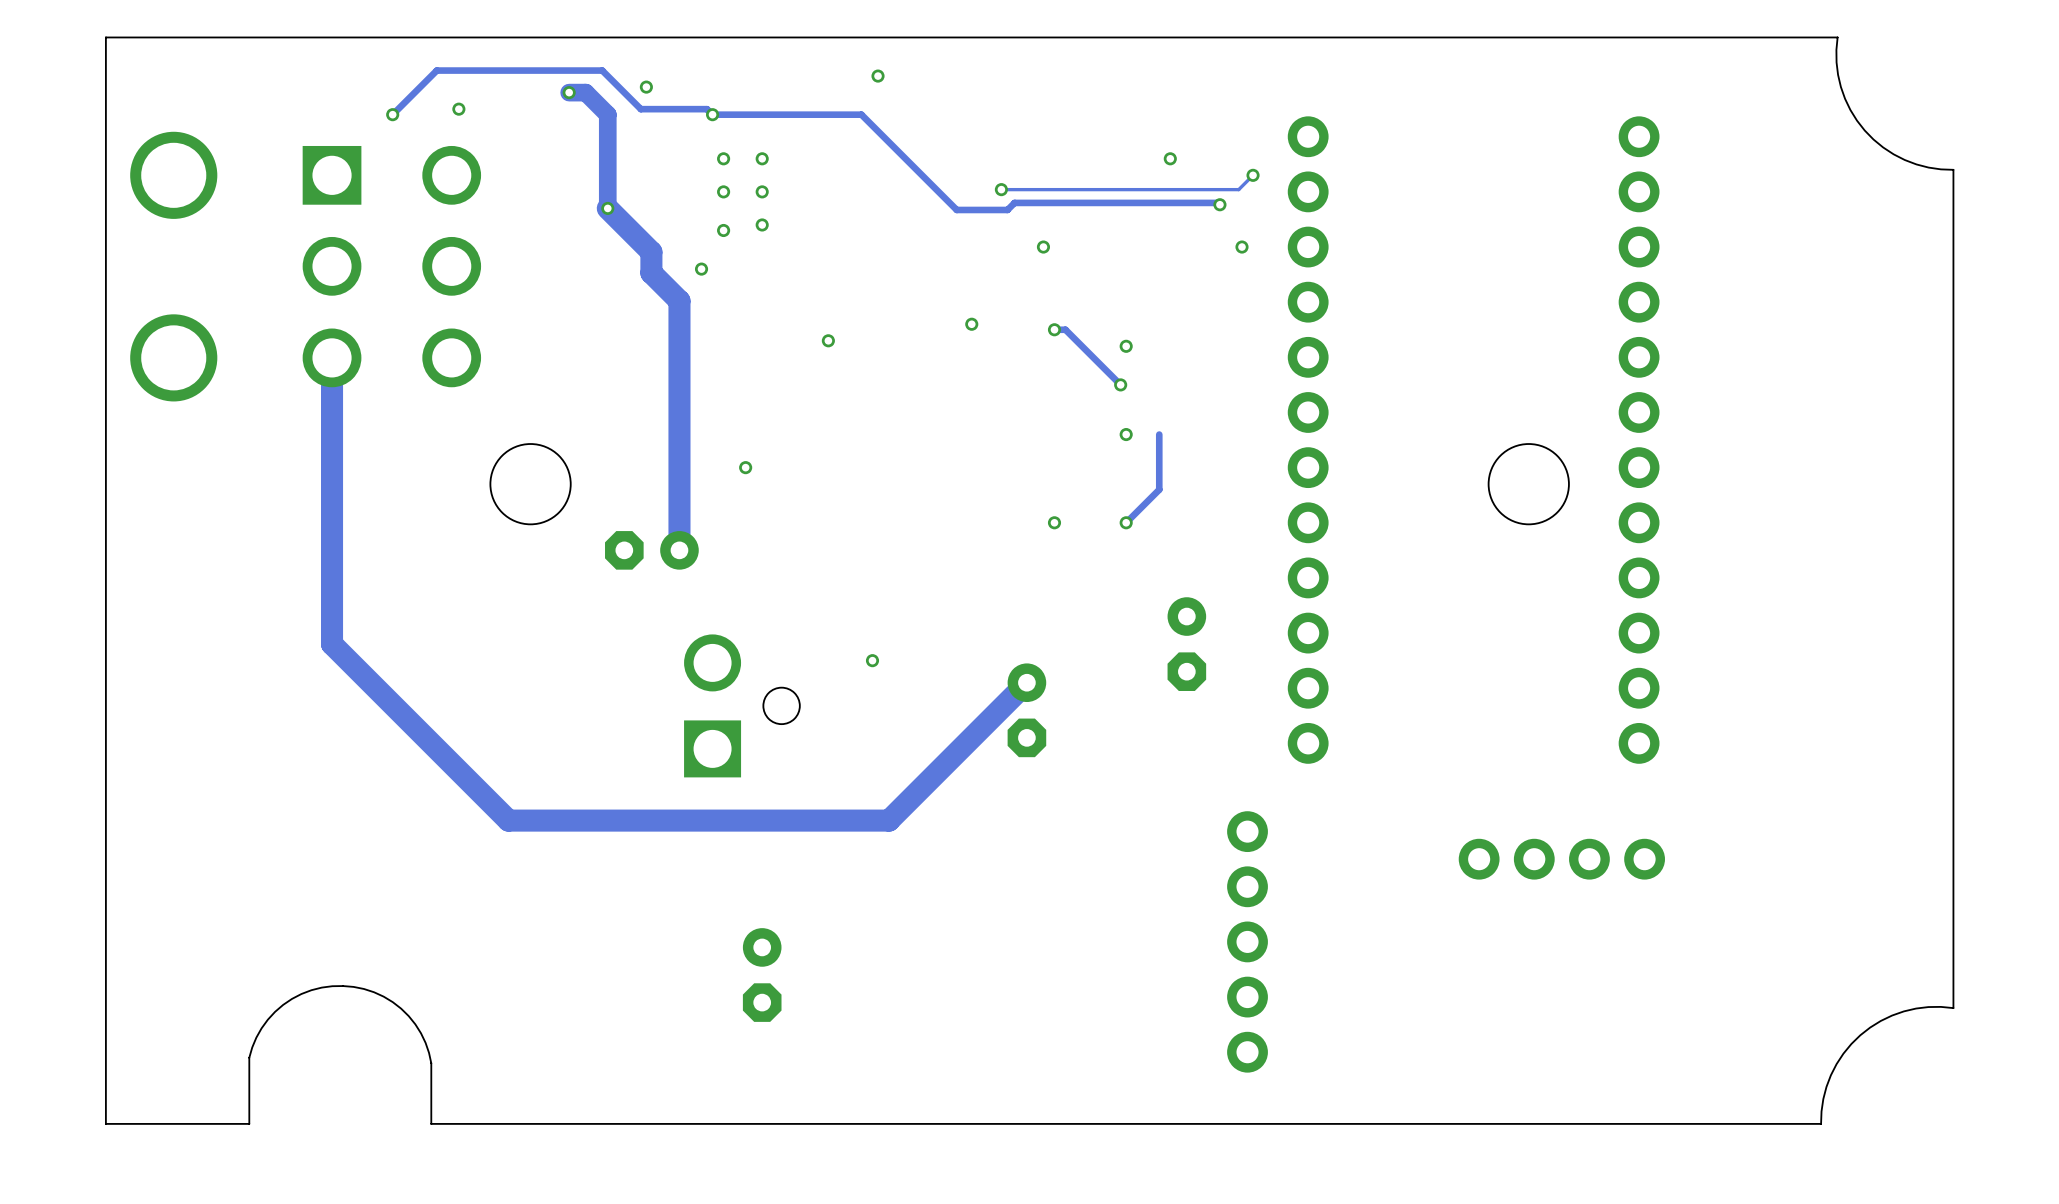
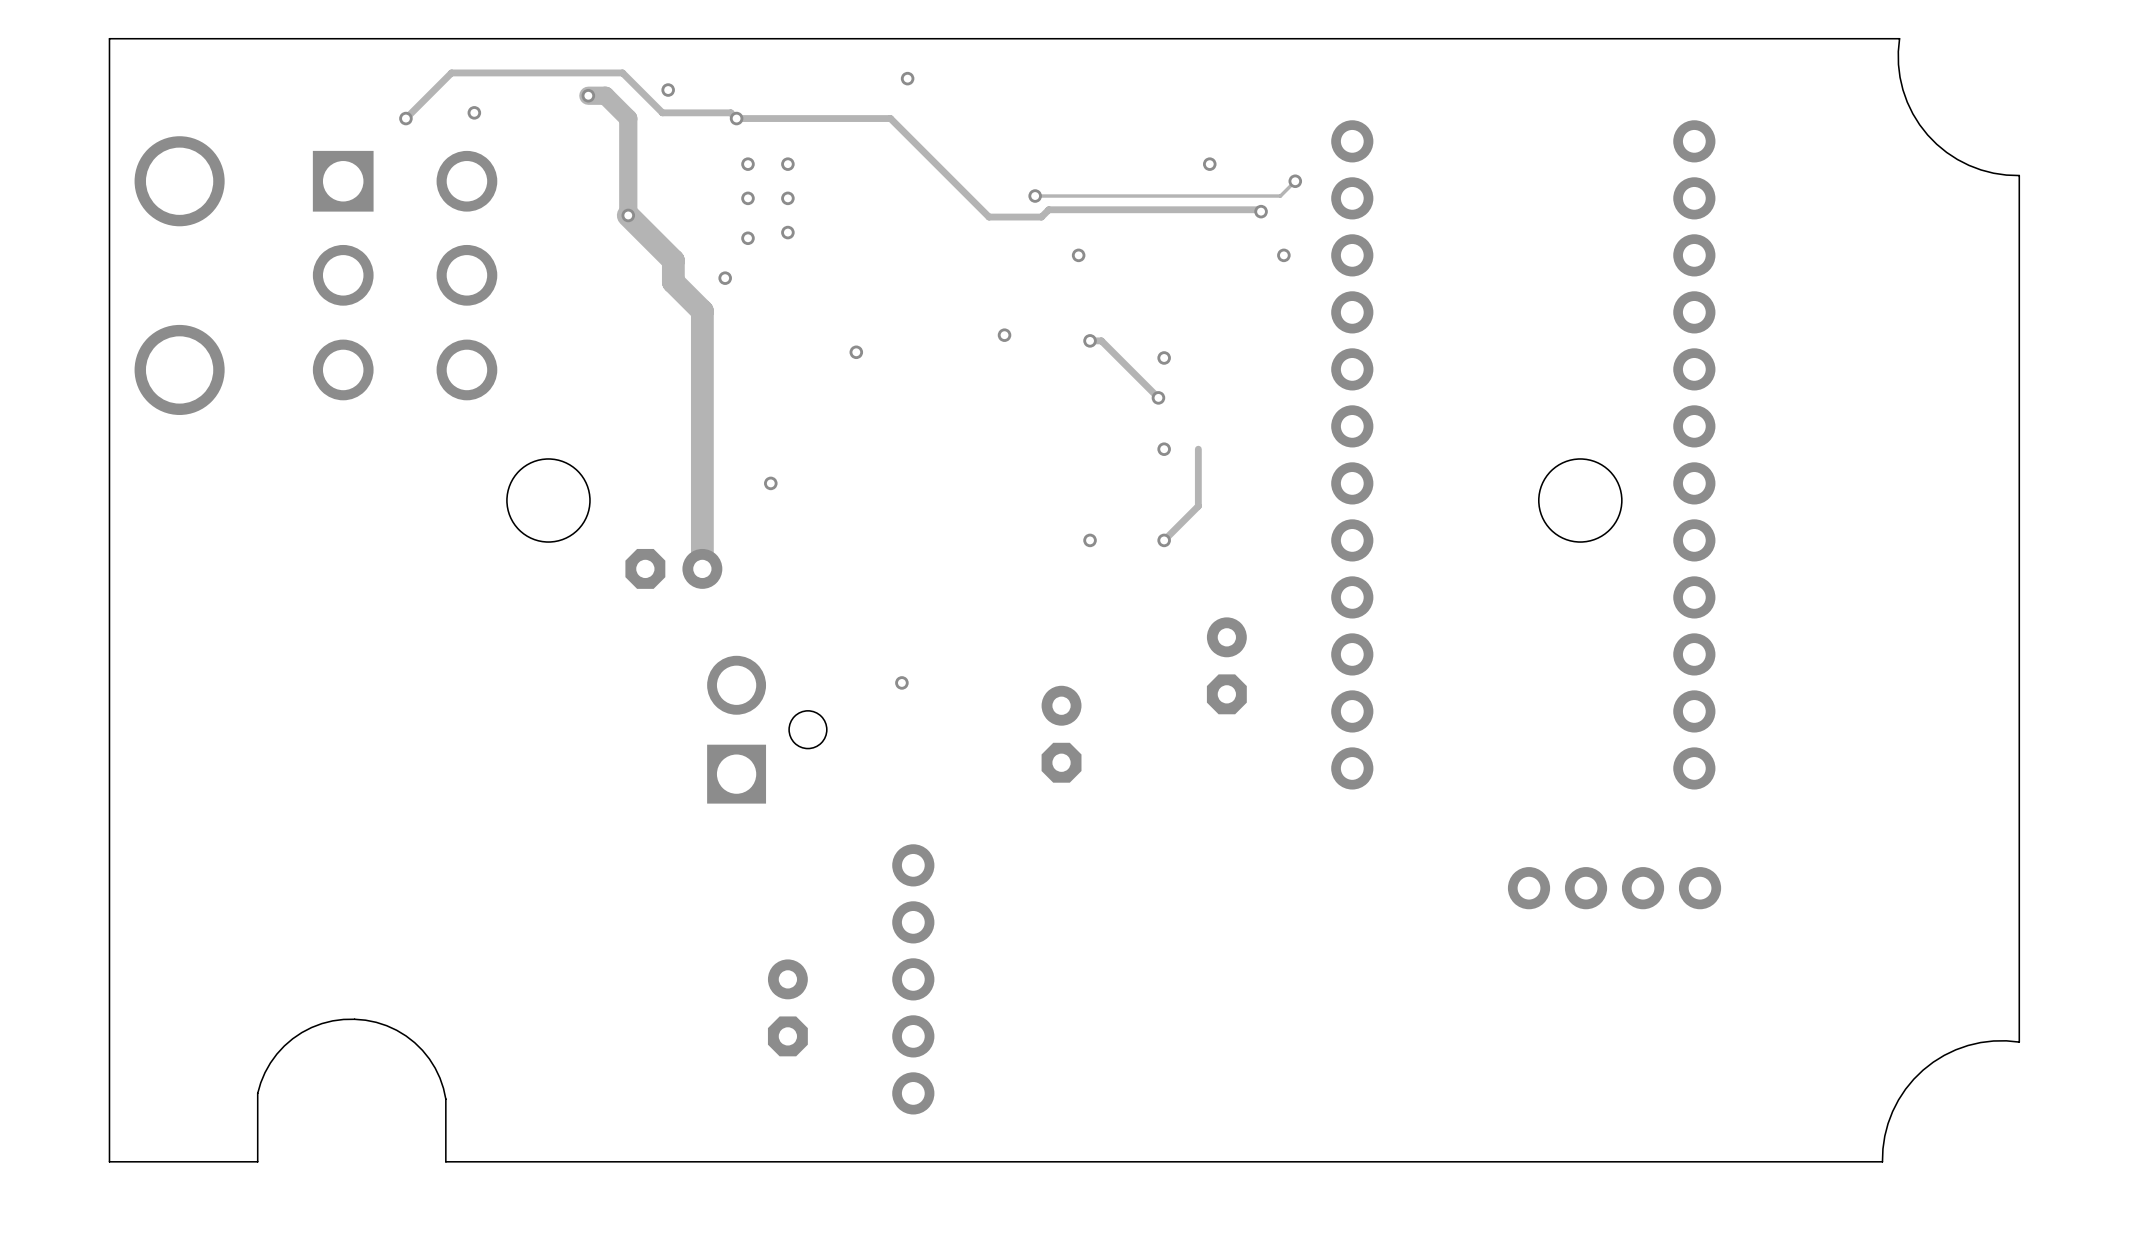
track: (332, 357) (332, 644) (508, 820) (889, 820) (1026, 682) -> none
part position: (1247, 941) -> (913, 979)

